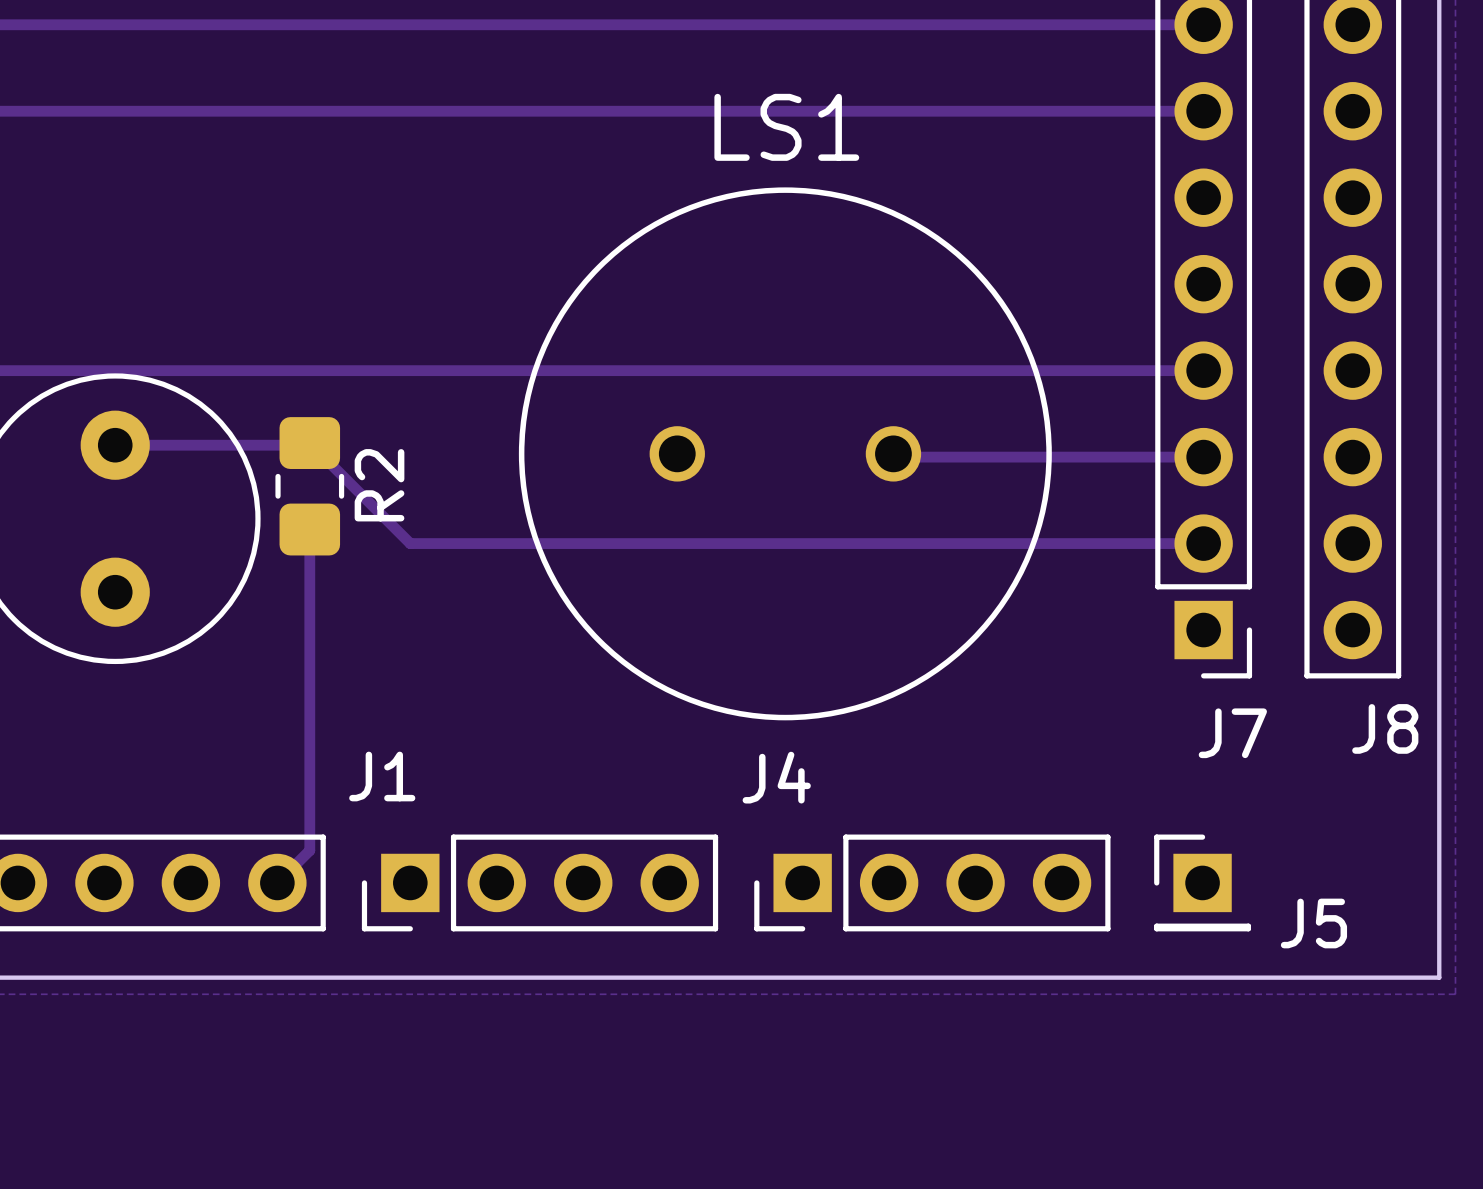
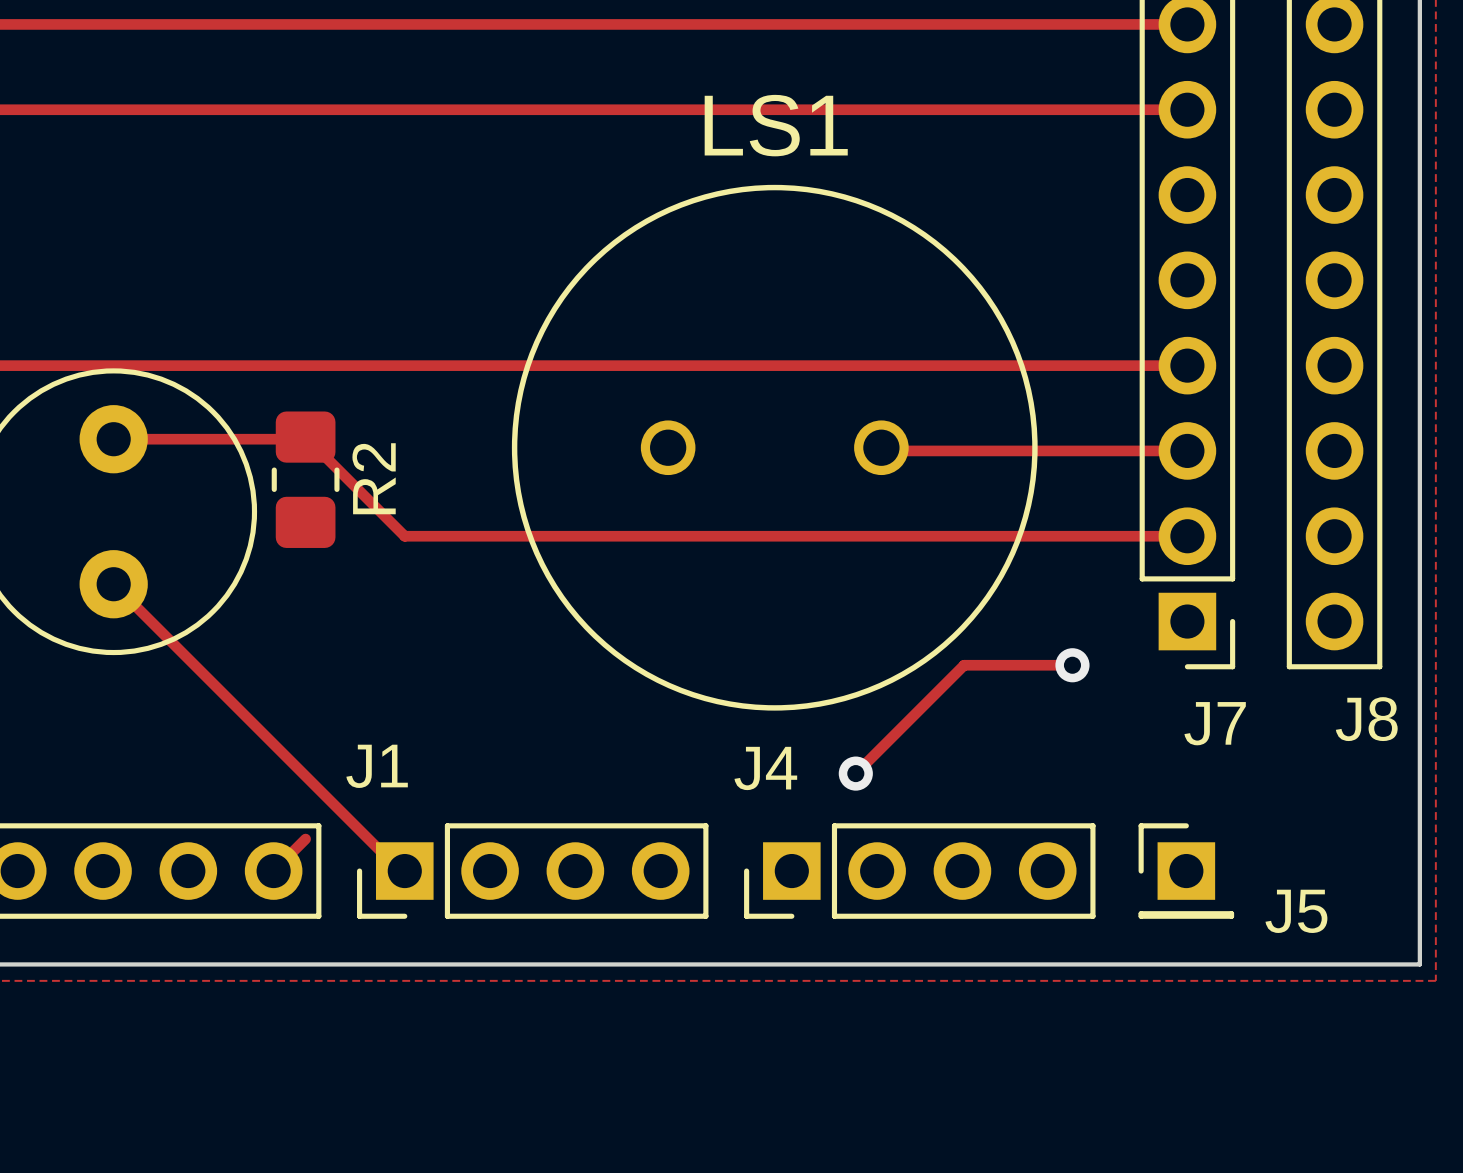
track: (309, 529) (309, 850) -> none
track: none -> (113, 584) (400, 871) (404, 871)
track: none -> (1072, 665) (964, 665) (855, 773)
via: none -> (1072, 665)
via: none -> (855, 773)

